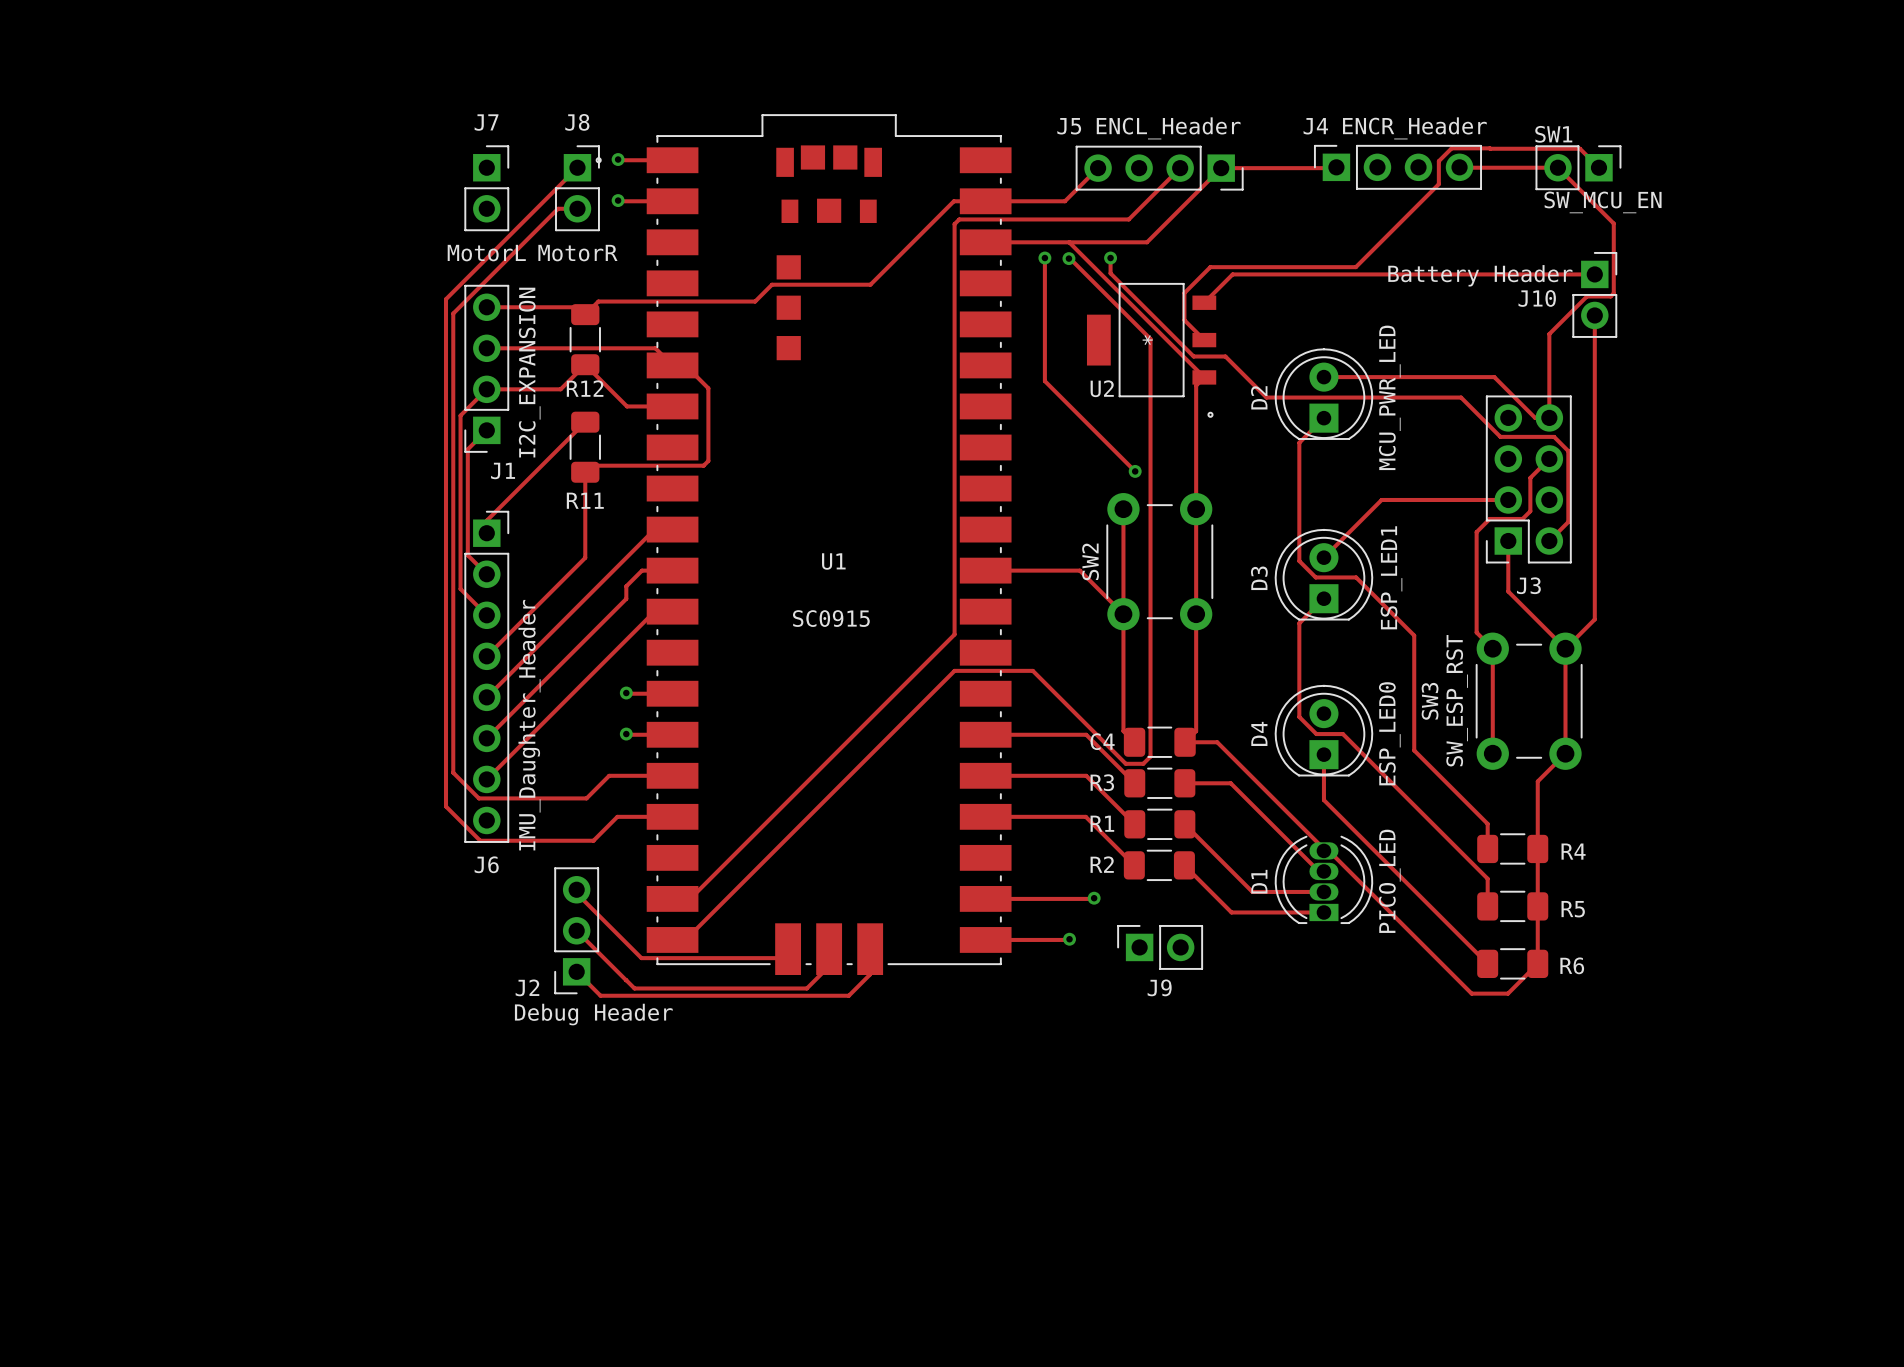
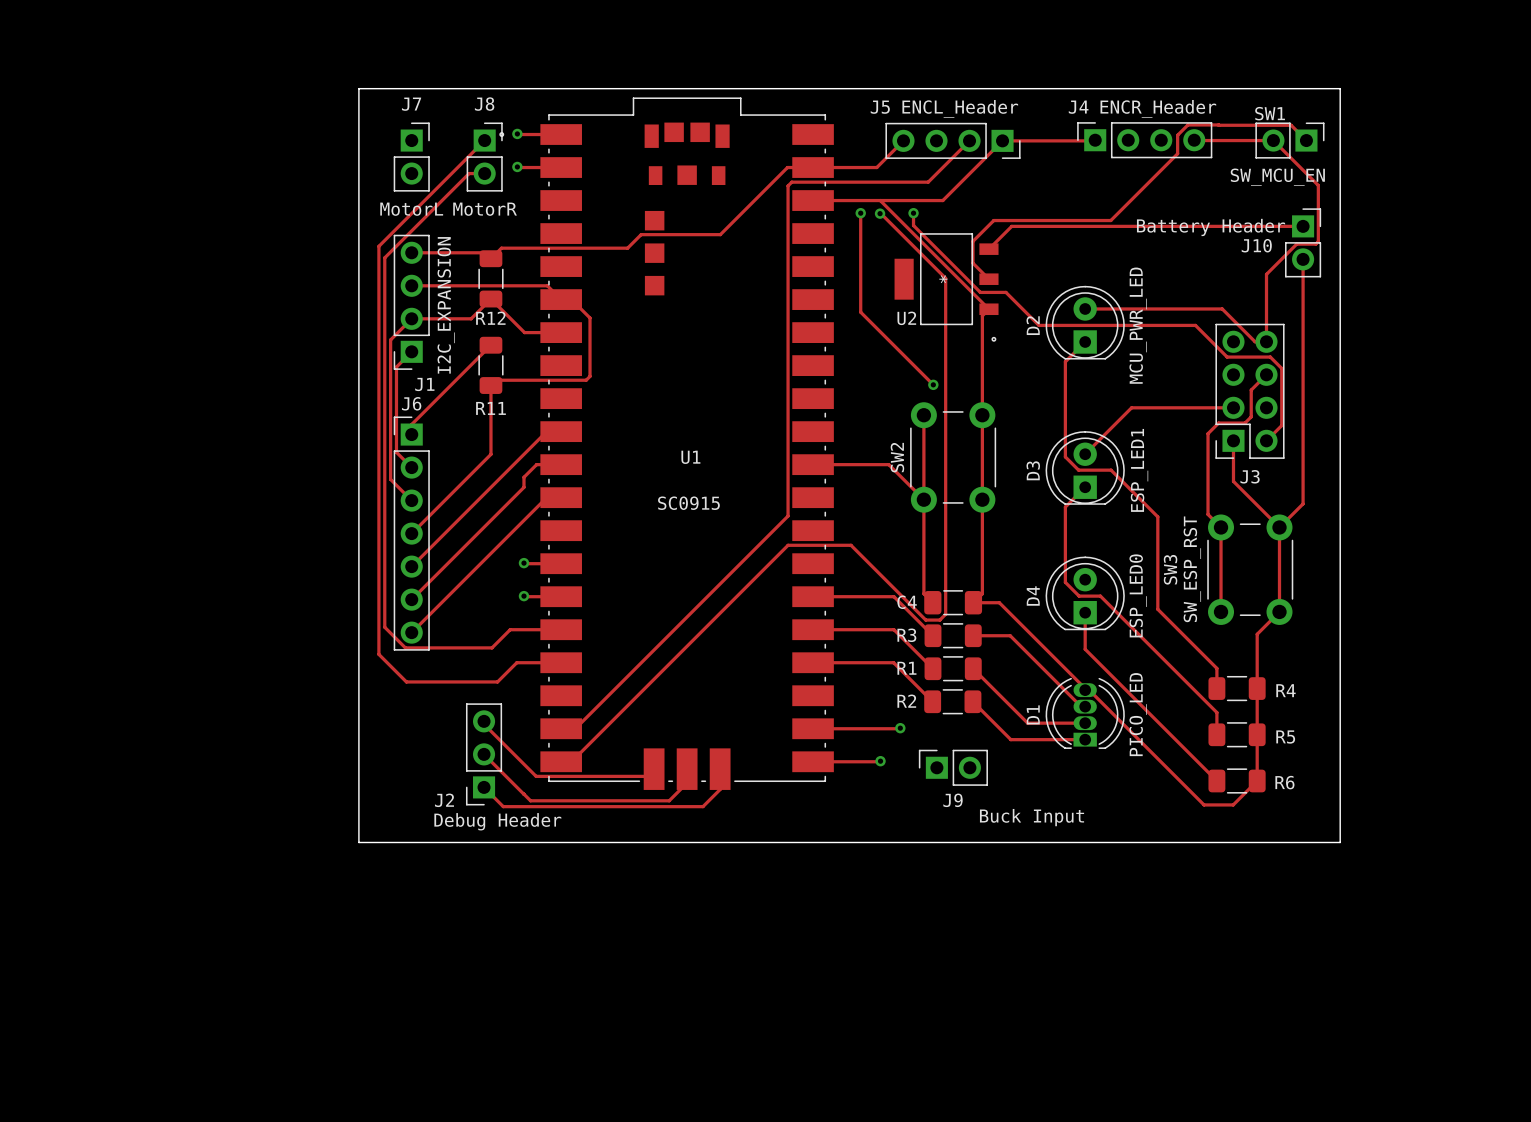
board edge: none -> (358, 88) (1340, 88) (1340, 842) (358, 842) (358, 88)
SW1 value position: SW_MCU_EN (1603, 202) -> SW_MCU_EN (1277, 177)
J6 footprint: [464, 510, 510, 843] -> [393, 416, 430, 651]
J6 value: IMU_Daughter_Header (529, 725) -> none
J6 name position: J6 (486, 864) -> J6 (411, 403)
J9 value: none -> Buck Input (1032, 817)

